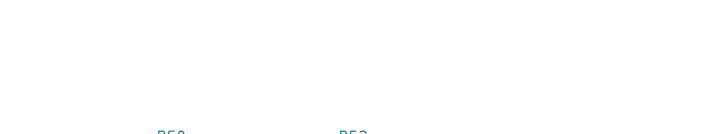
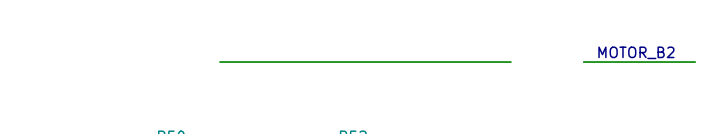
text: none -> MOTOR_B2 (636, 52)
wire: none -> (219, 62) (510, 62)
wire: none -> (583, 62) (695, 62)

